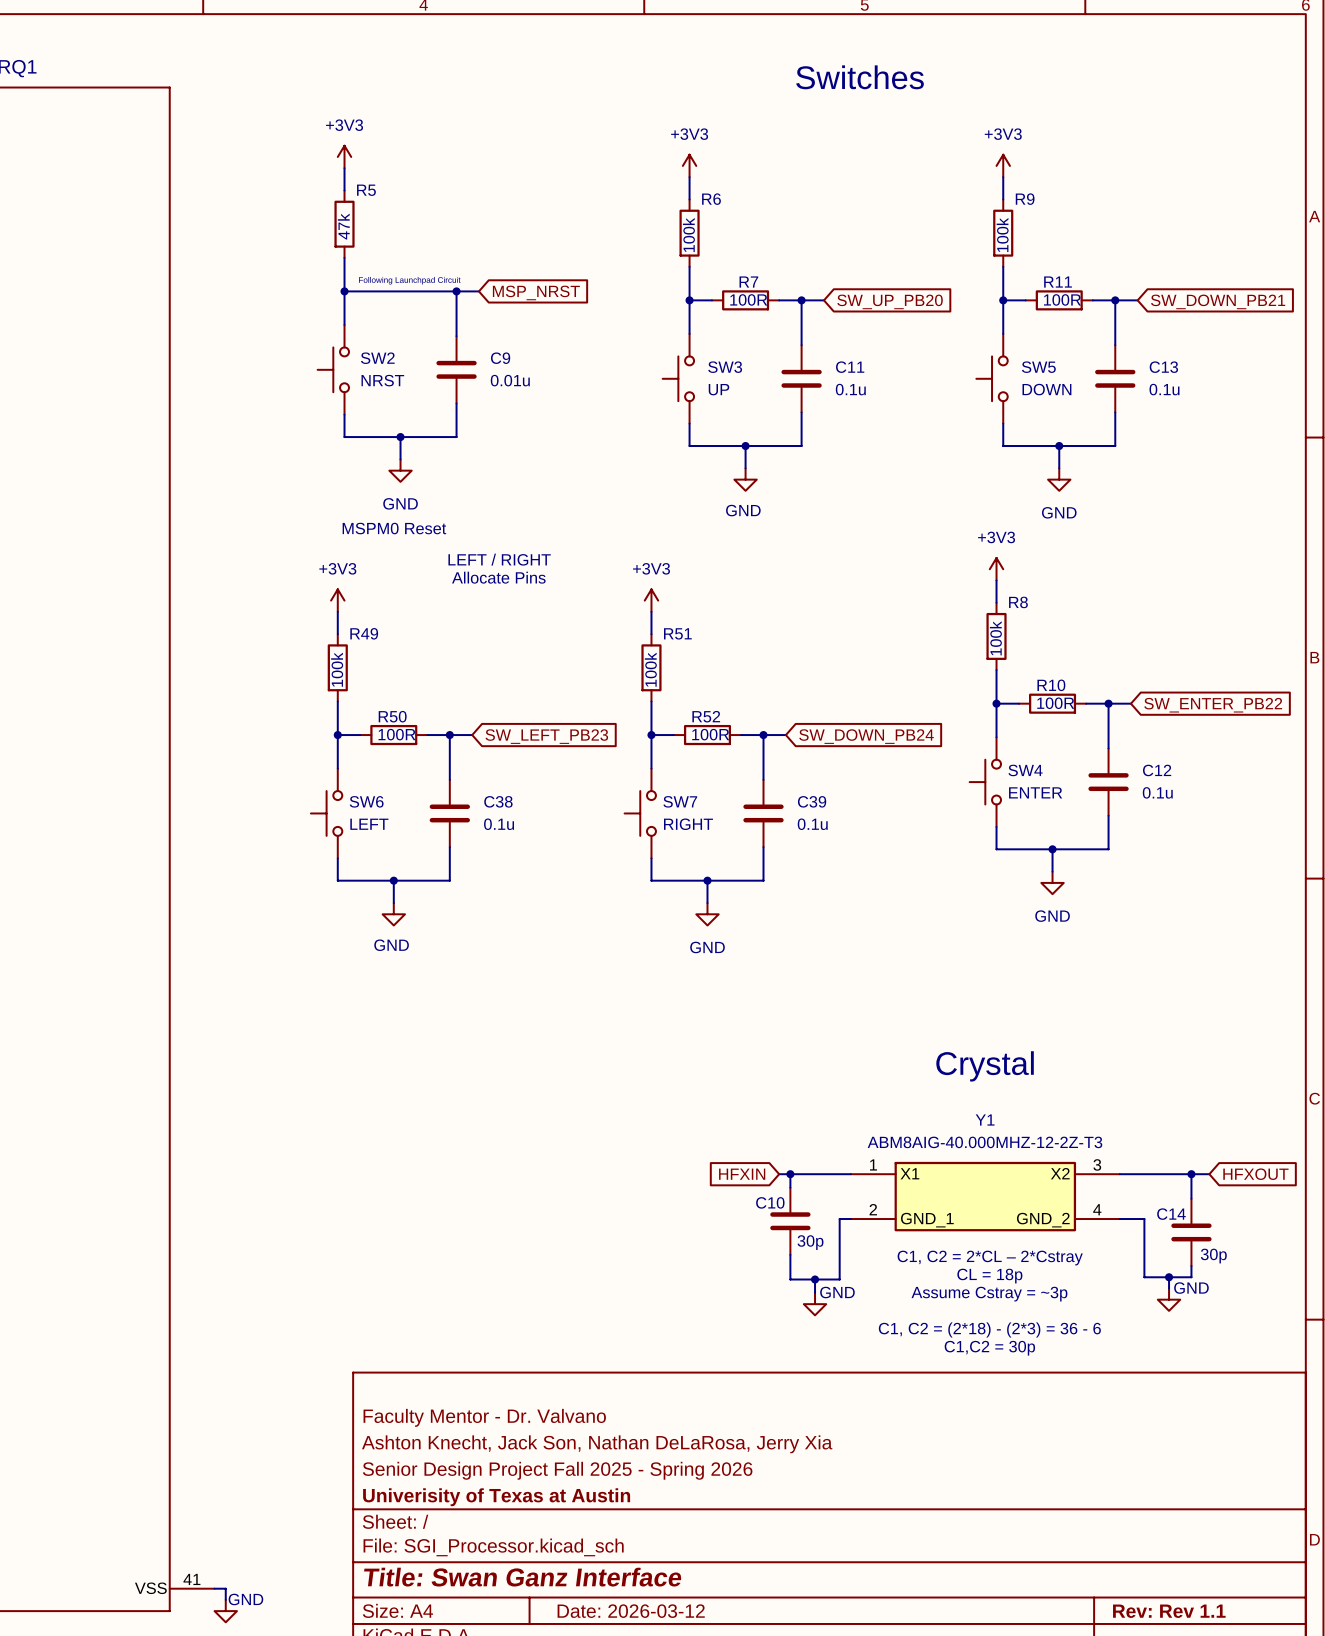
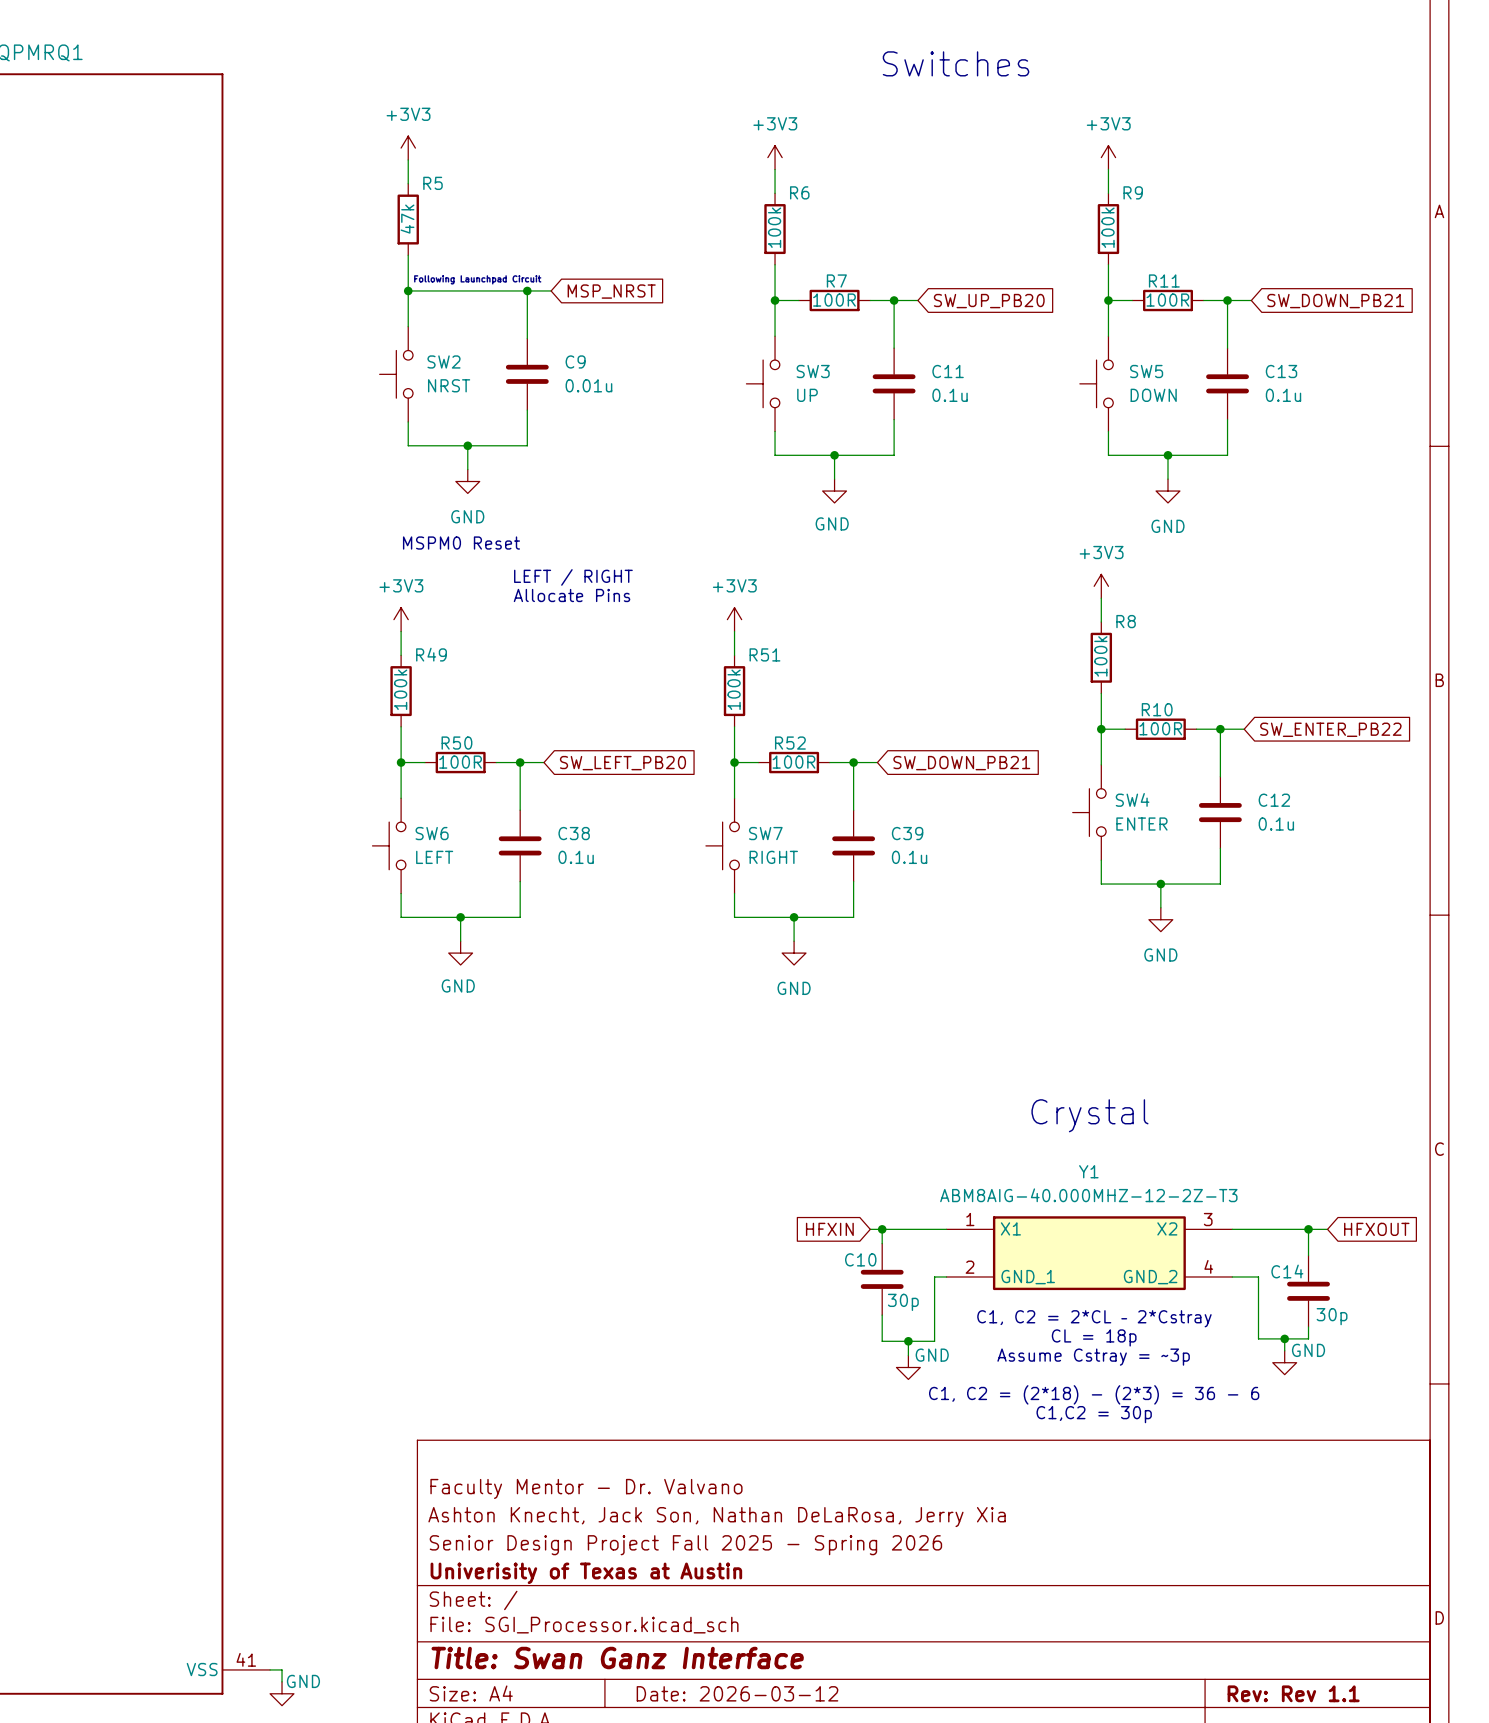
global label: SW_LEFT_PB23 (546, 736) -> SW_LEFT_PB20 (622, 763)
global label: SW_DOWN_PB24 (866, 736) -> SW_DOWN_PB21 (961, 763)

